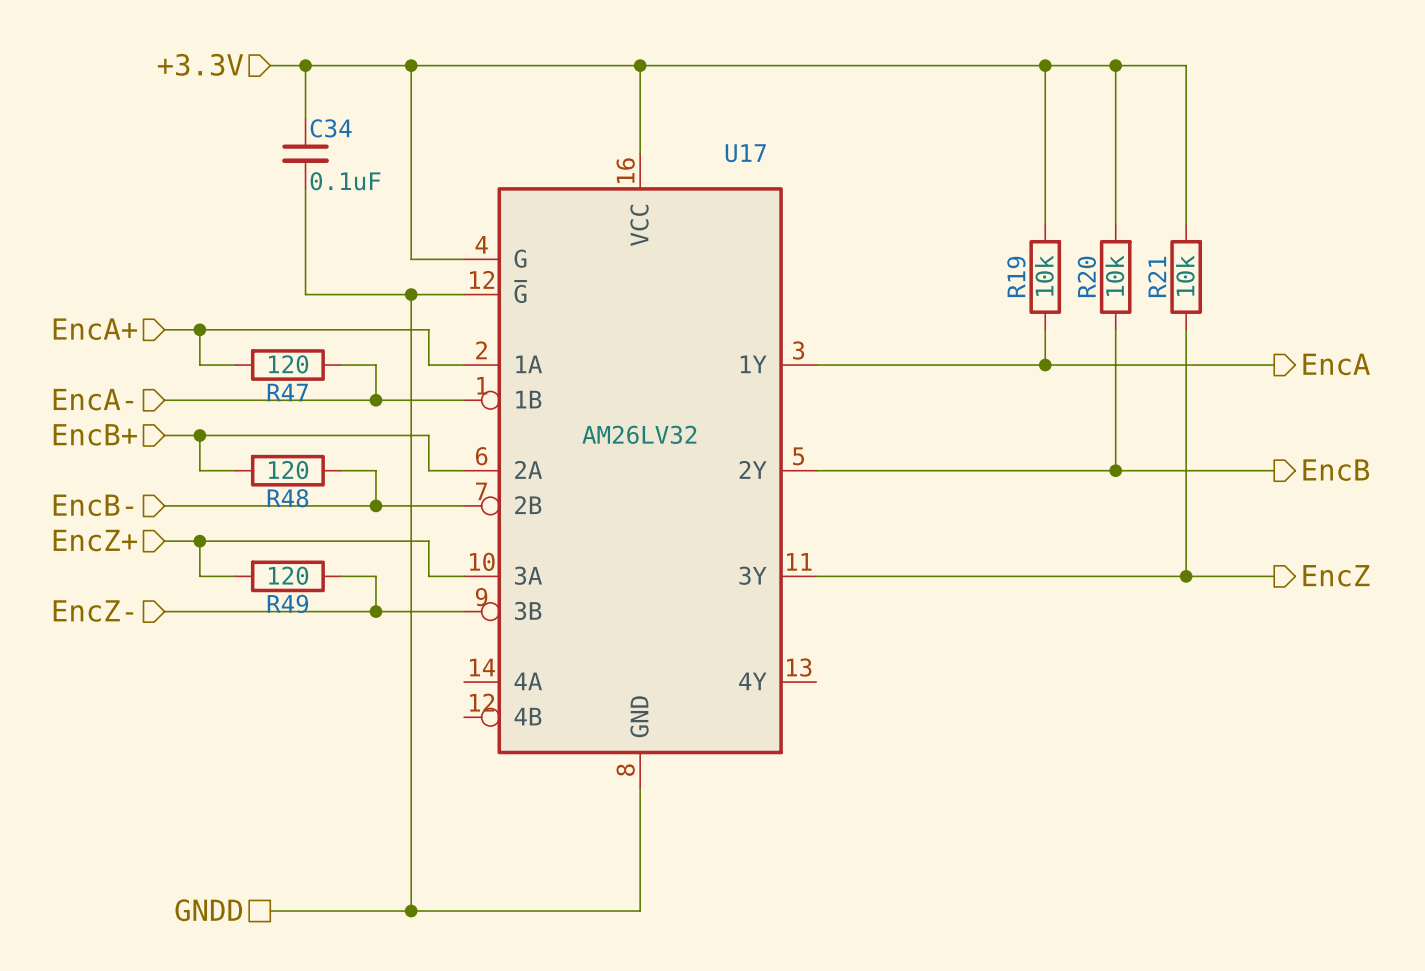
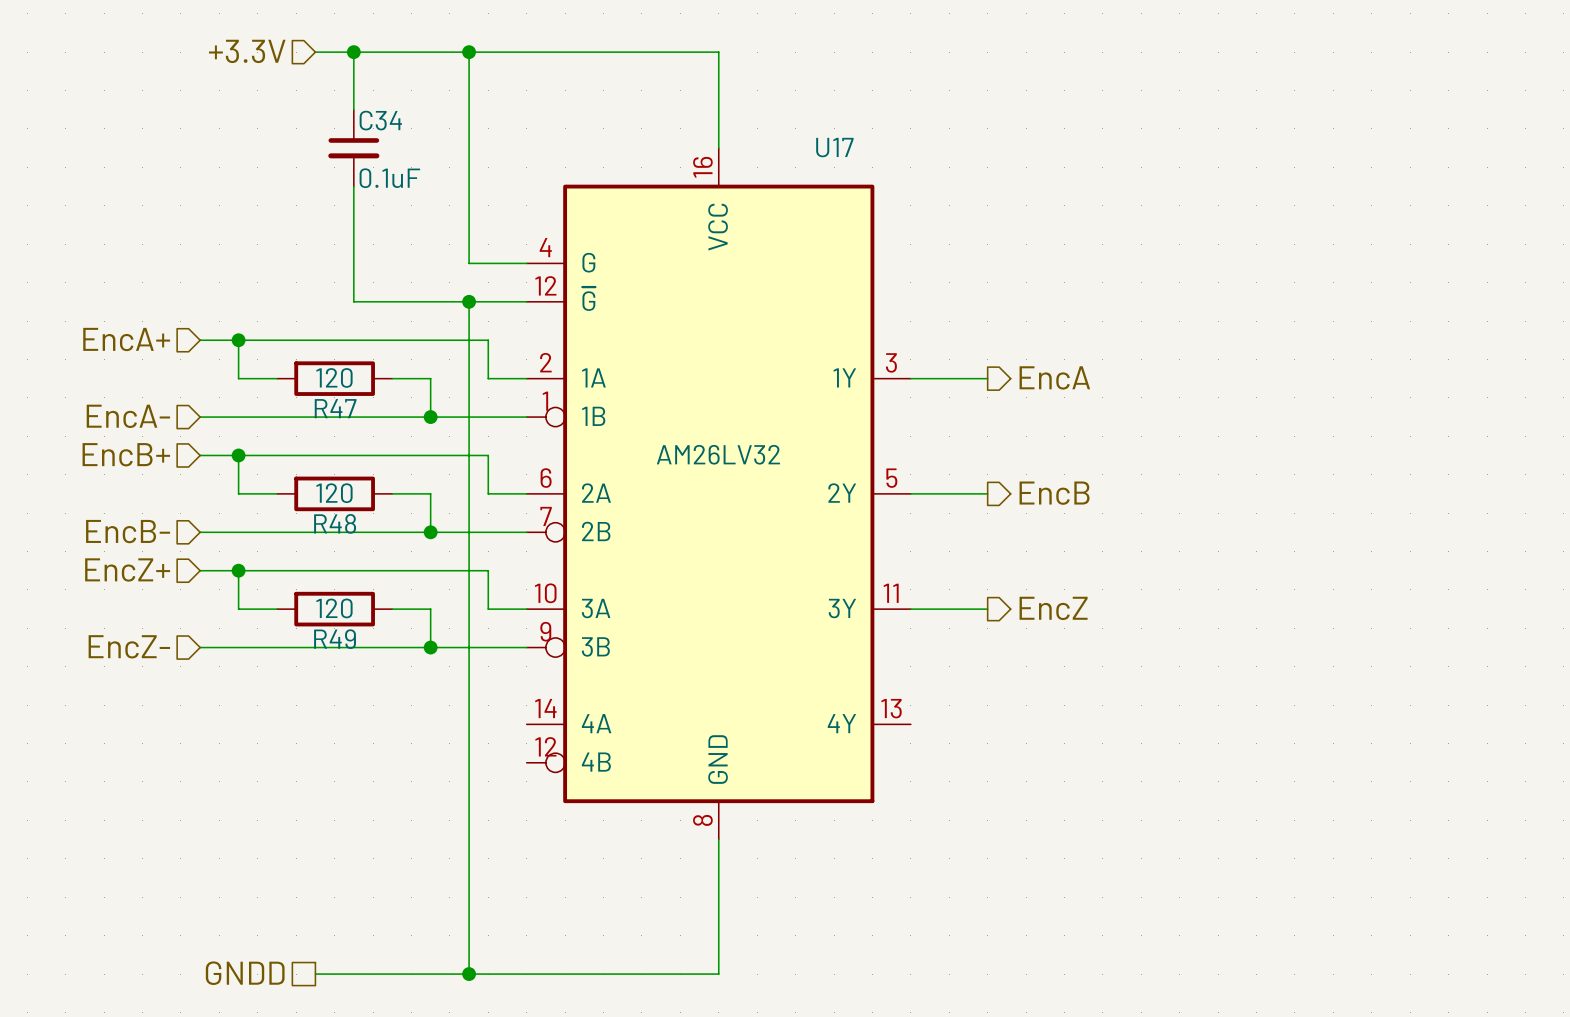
wire: (640, 65) (1186, 65) (1186, 224) -> none
junction: (640, 65) -> none
wire: (1045, 65) (1045, 224) -> none
junction: (1045, 65) -> none
wire: (1115, 65) (1115, 224) -> none
junction: (1115, 65) -> none
R19: 10k (1045, 276) -> none
R20: 10k (1115, 276) -> none
R21: 10k (1186, 276) -> none
wire: (1045, 329) (1045, 365) -> none
wire: (1115, 329) (1115, 470) -> none
wire: (1186, 329) (1186, 576) -> none
hierarchical label: none -> EncA (1054, 377)
hierarchical label: EncA (1336, 364) -> none
wire: (886, 365) (1274, 365) -> none
junction: (1045, 365) -> none
wire: (886, 470) (1274, 470) -> none
hierarchical label: none -> EncB (1054, 493)
junction: (1115, 470) -> none
hierarchical label: EncB (1336, 470) -> none
hierarchical label: none -> EncZ (1053, 608)
hierarchical label: EncZ (1336, 575) -> none
wire: (886, 576) (1274, 576) -> none
junction: (1186, 576) -> none

